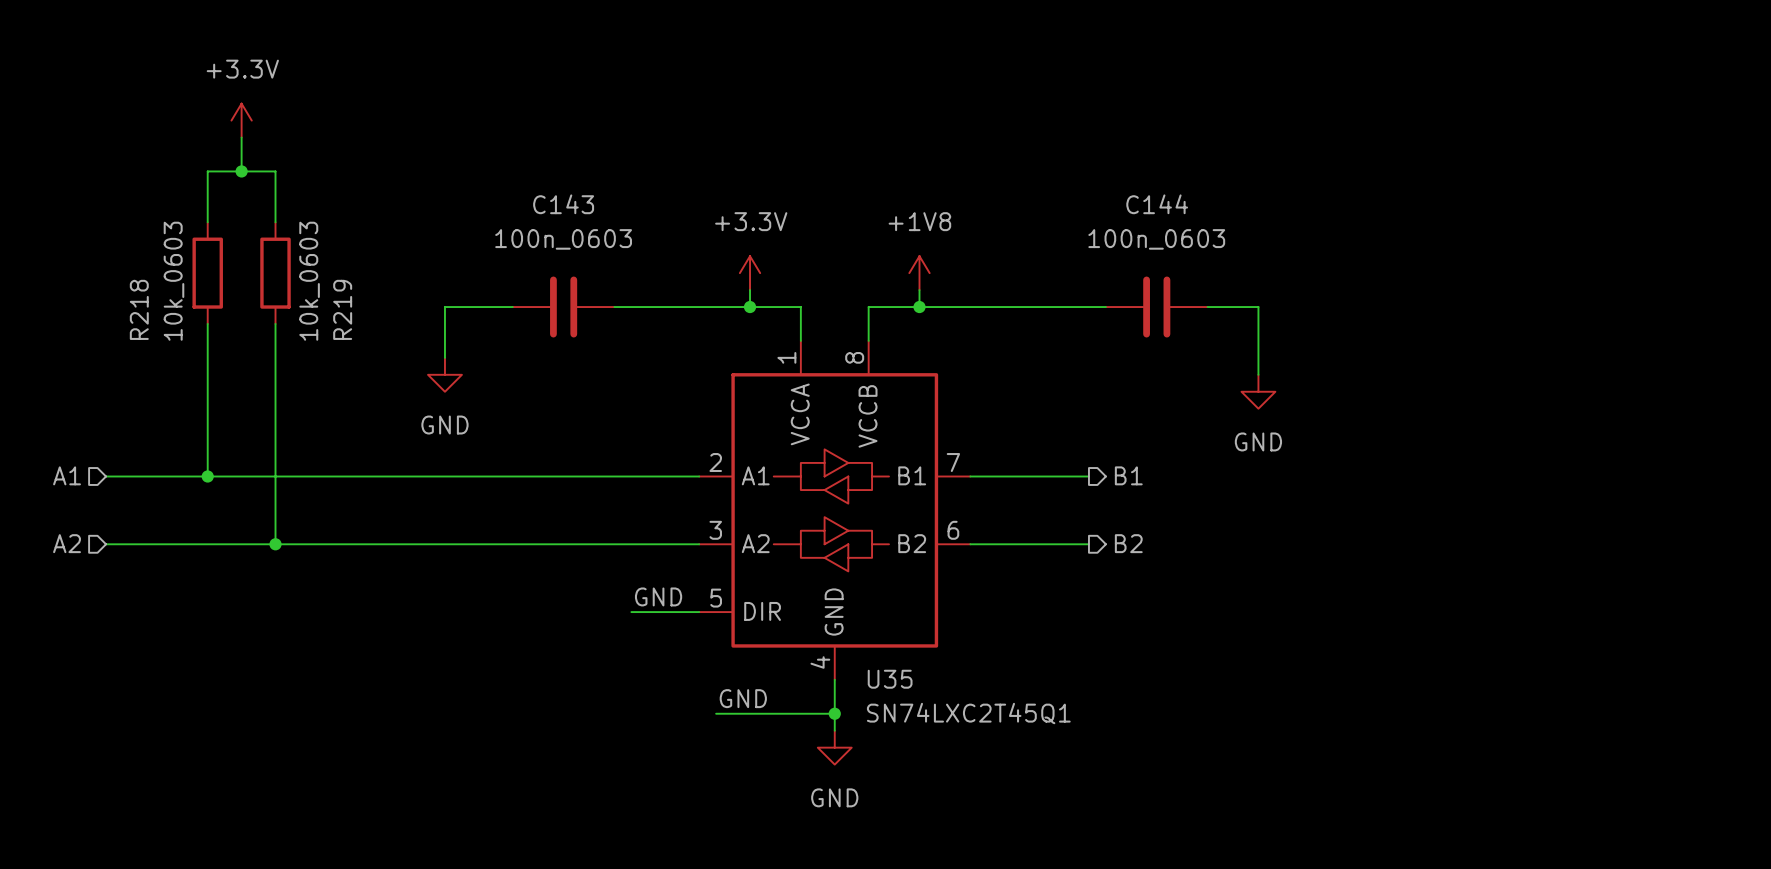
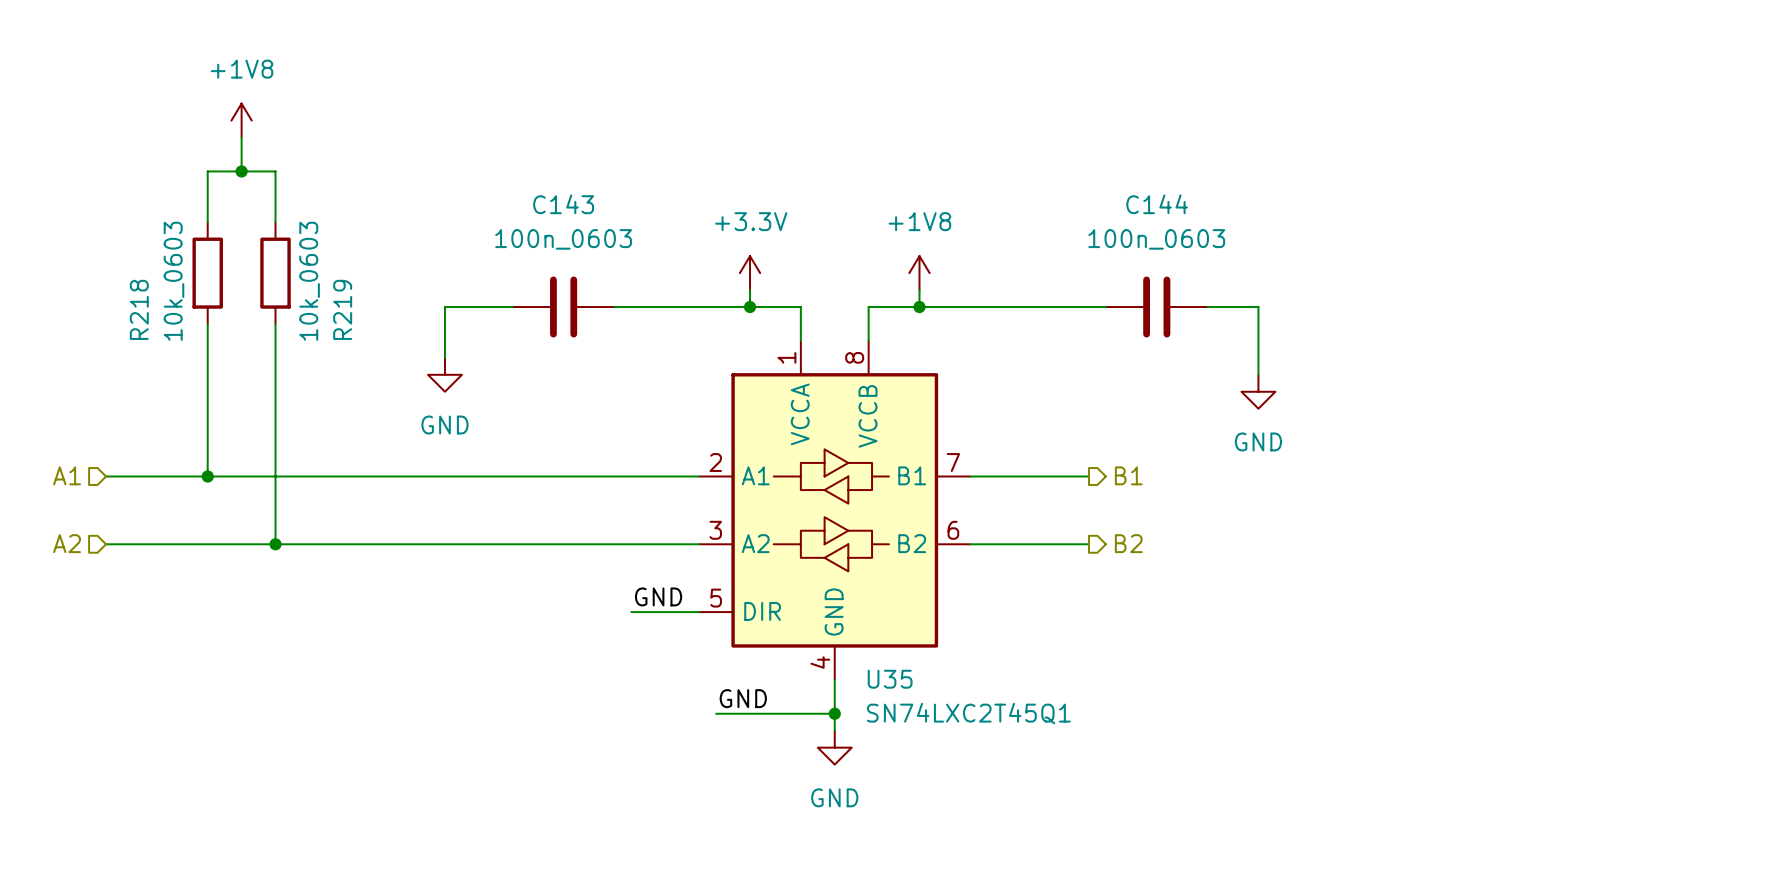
power symbol: +3.3V (241, 120) -> +1V8 (241, 120)

